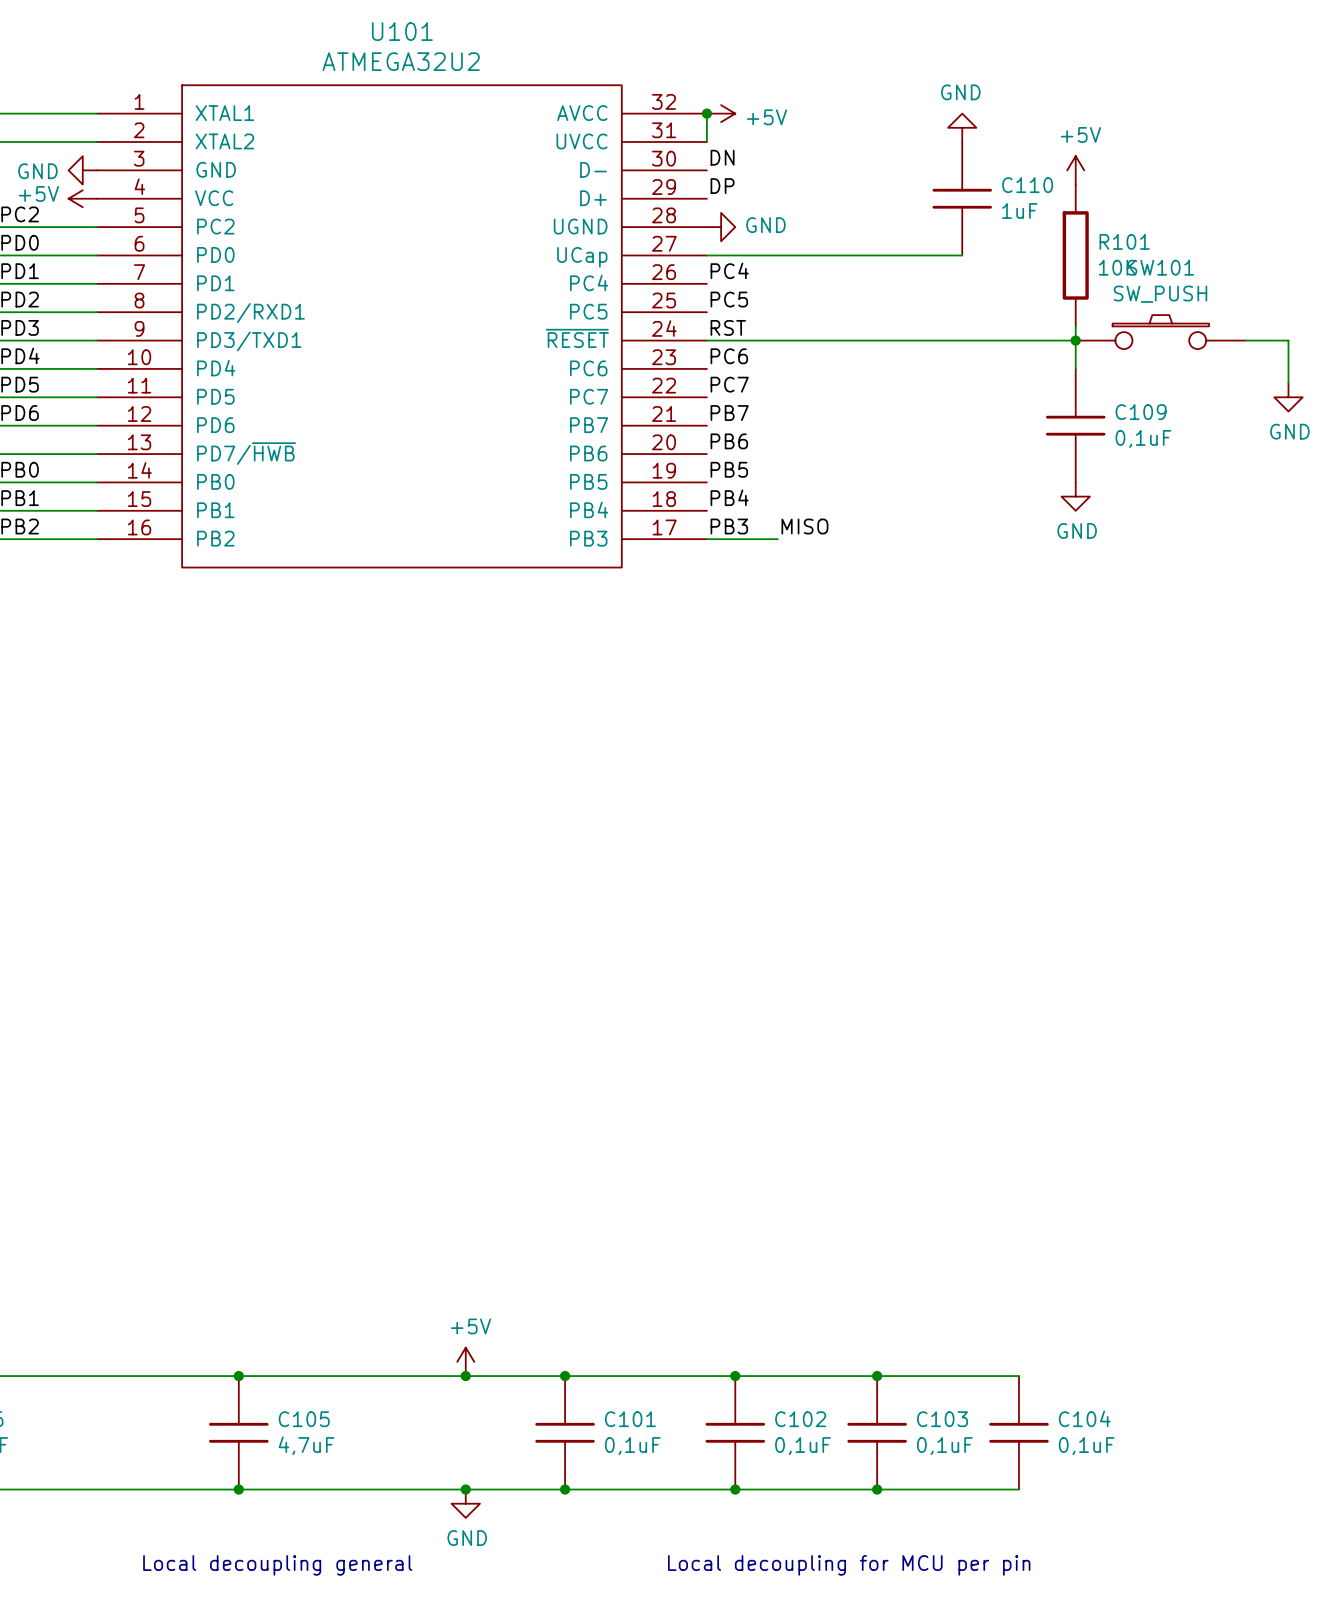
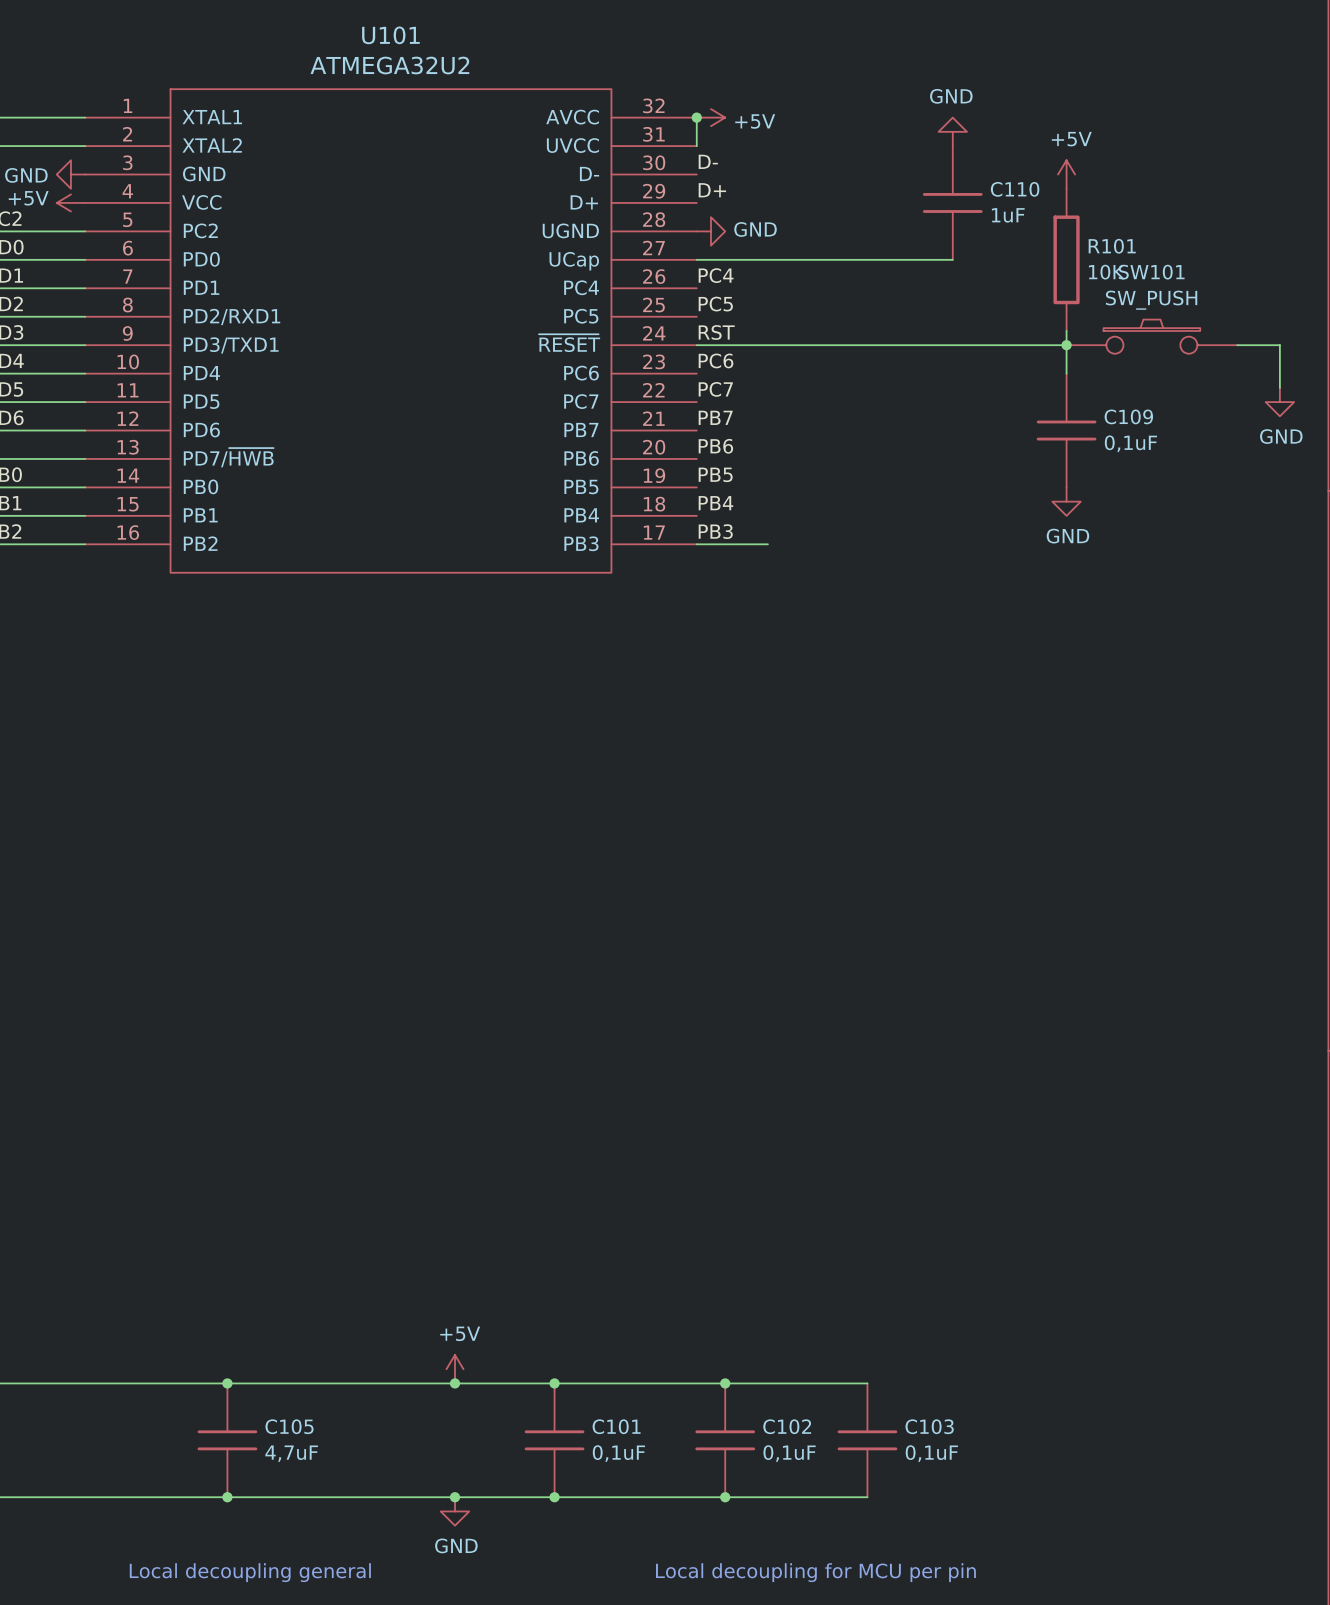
label: DN (722, 157) -> D- (708, 161)
label: DP (722, 186) -> D+ (712, 190)
label: MISO (804, 526) -> none
wire: (877, 1376) (1018, 1376) -> none
junction: (877, 1376) -> none
C104: 0,1uF (1018, 1432) -> none
wire: (877, 1489) (1018, 1489) -> none
junction: (877, 1489) -> none

